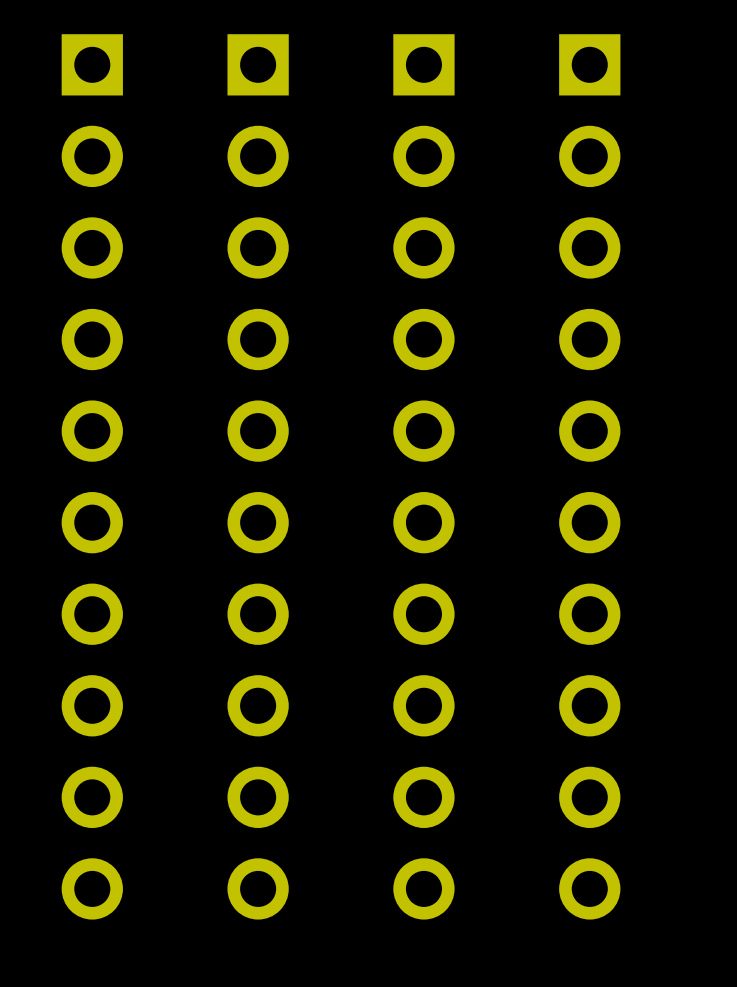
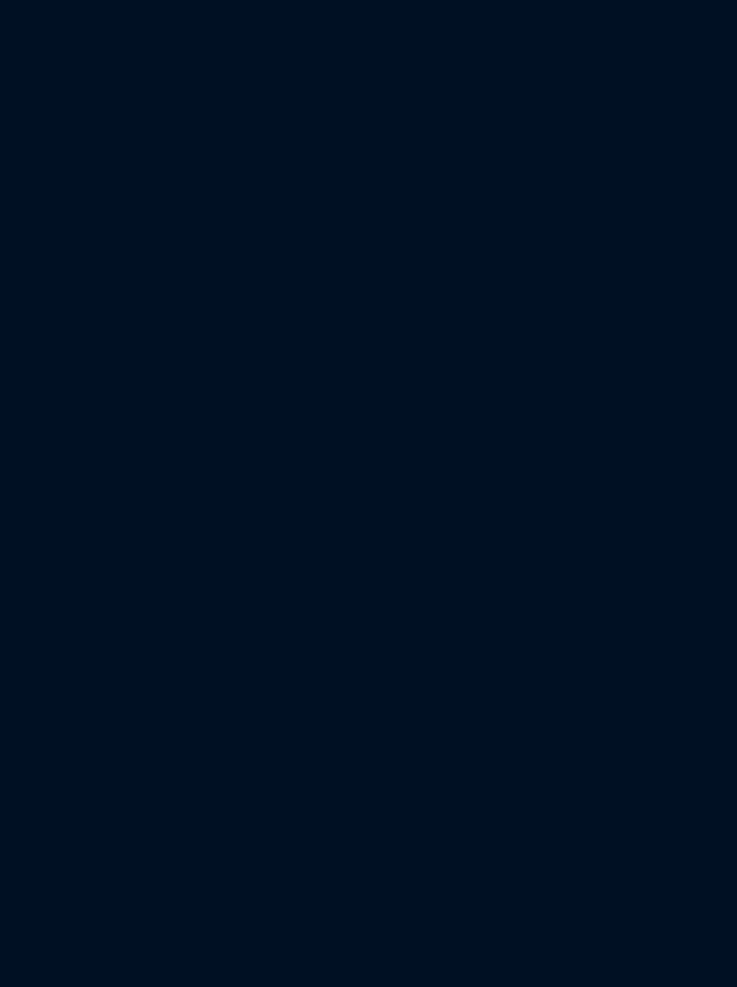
part: (92, 476) -> none
part: (258, 476) -> none
part: (423, 476) -> none
part: (589, 476) -> none

